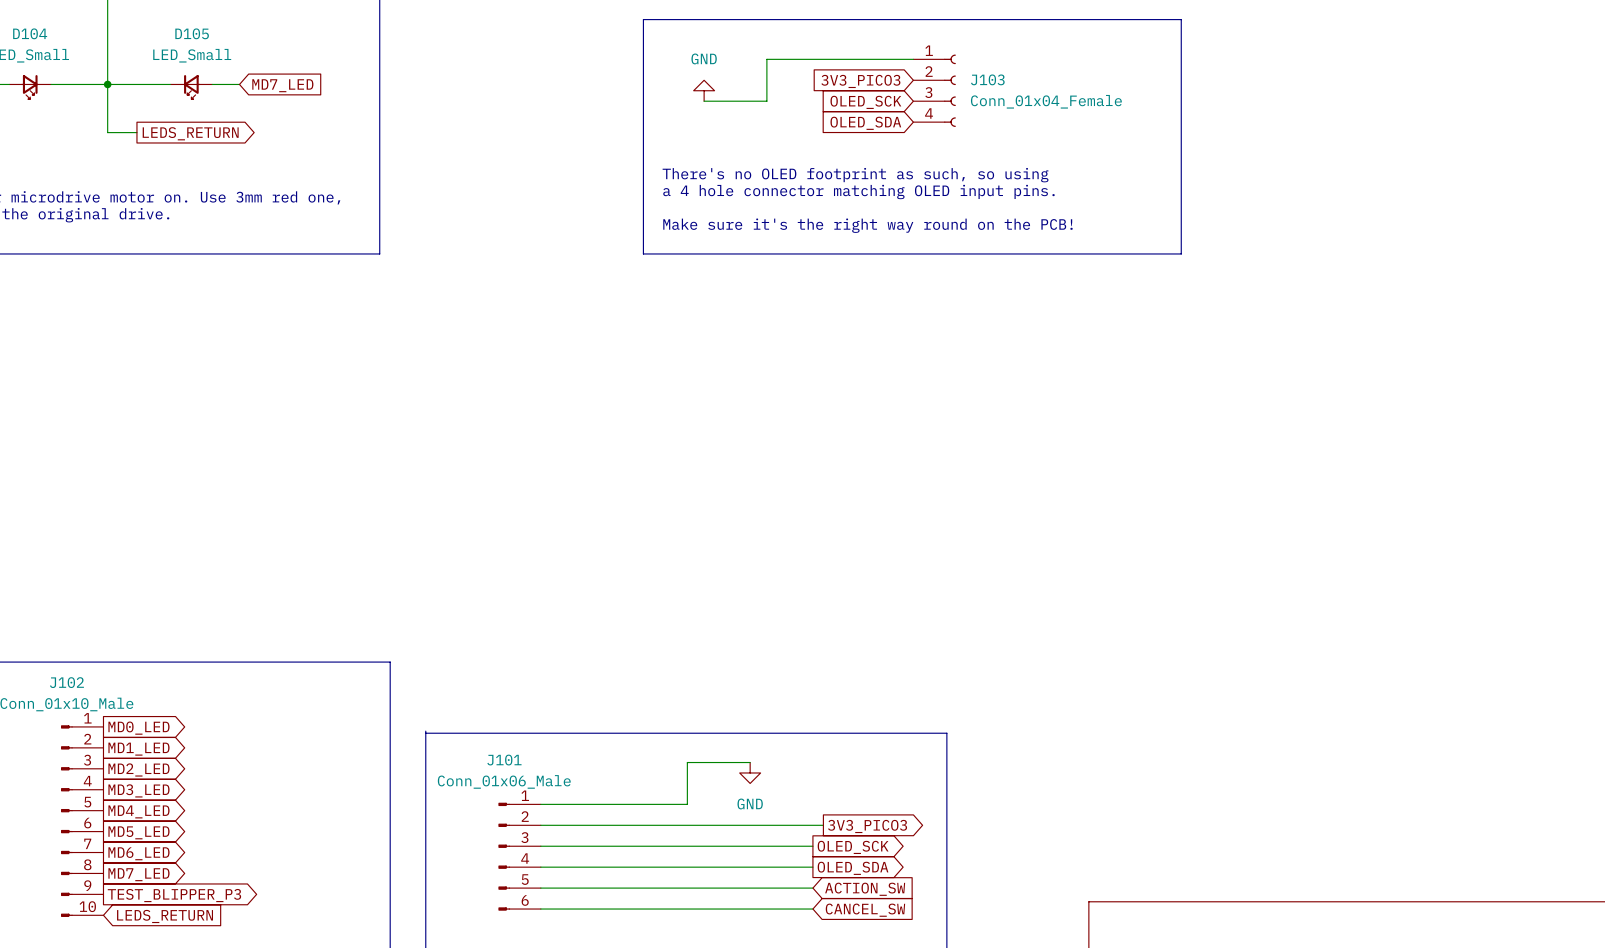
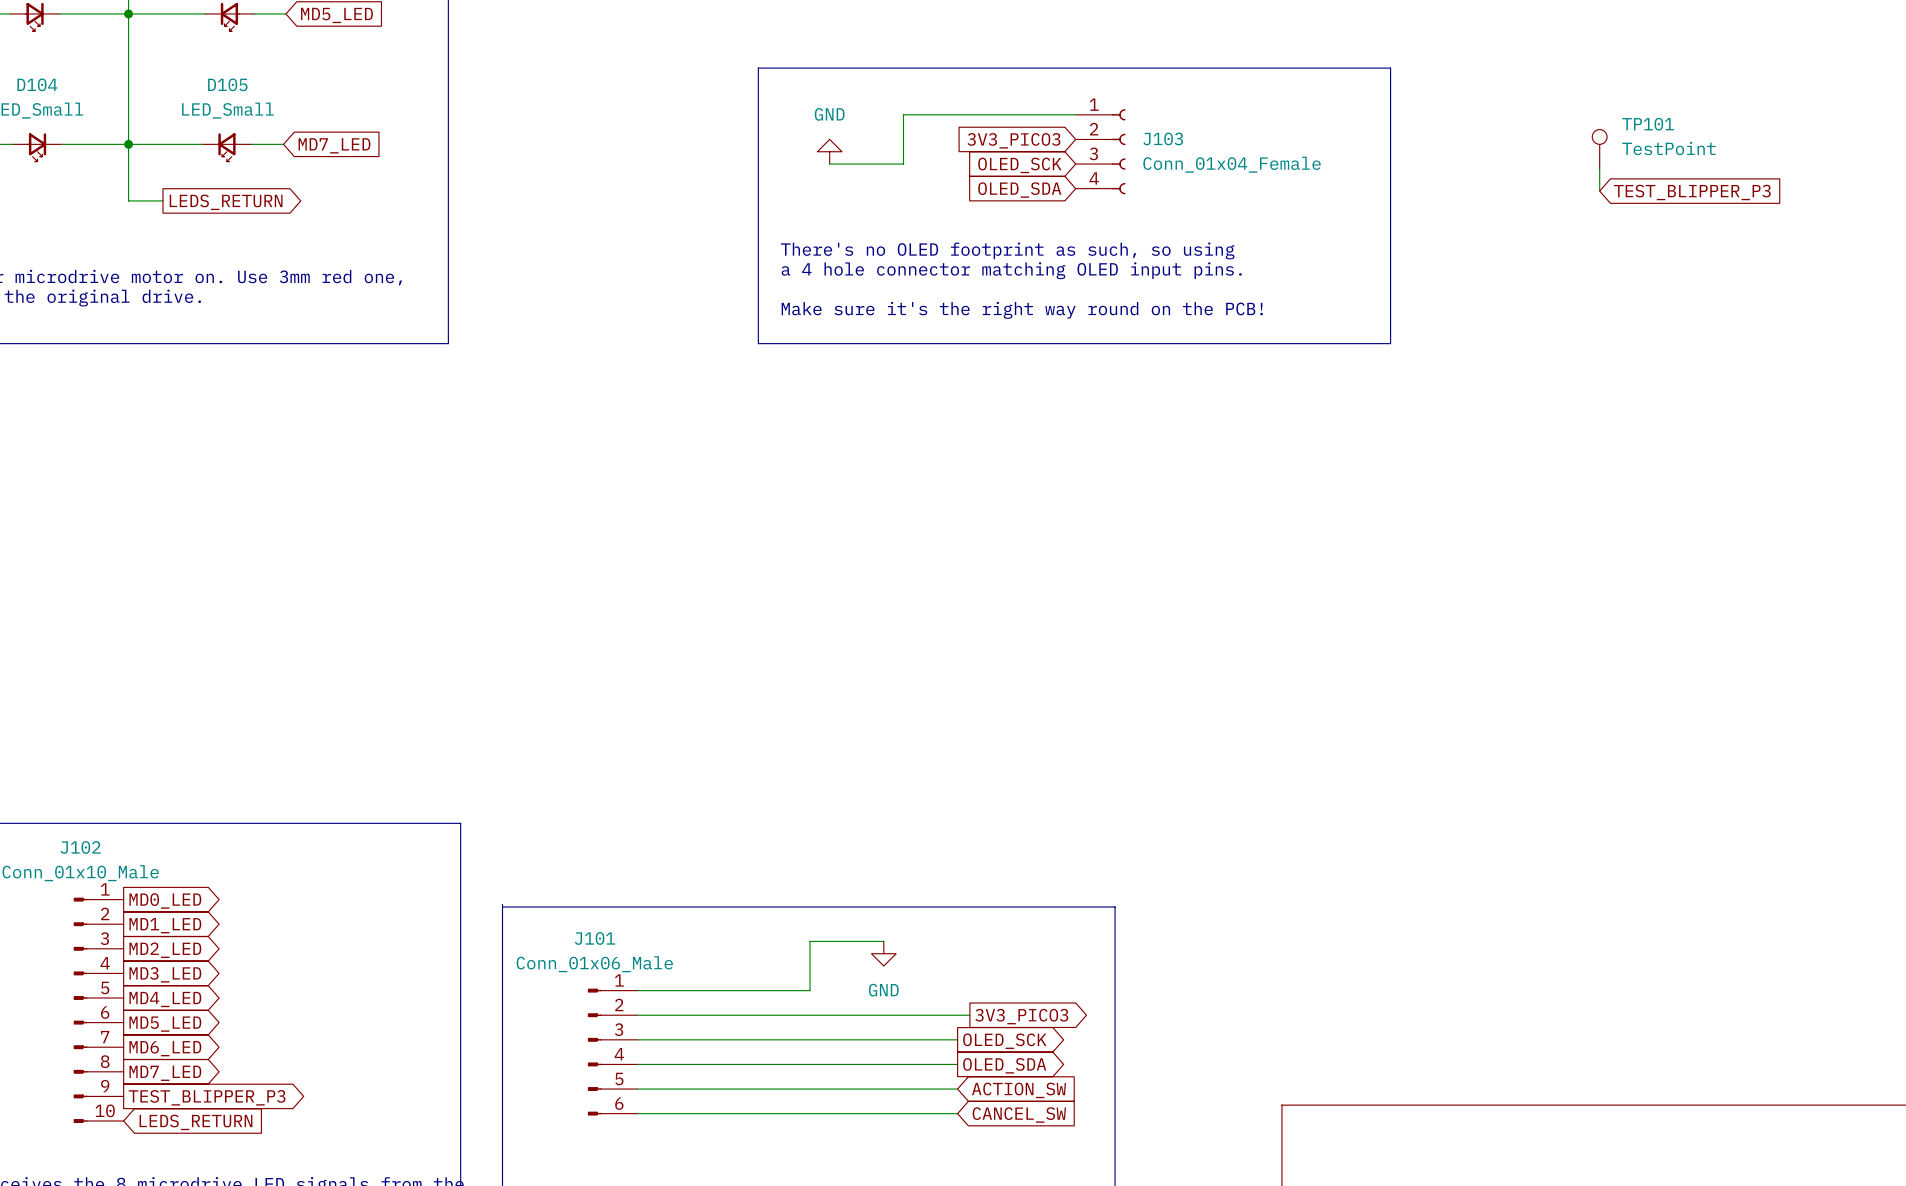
TP101: none -> TestPoint (1599, 149)
wire: none -> (1599, 168) (1599, 191)
global label: none -> TEST_BLIPPER_P3 (1692, 192)

